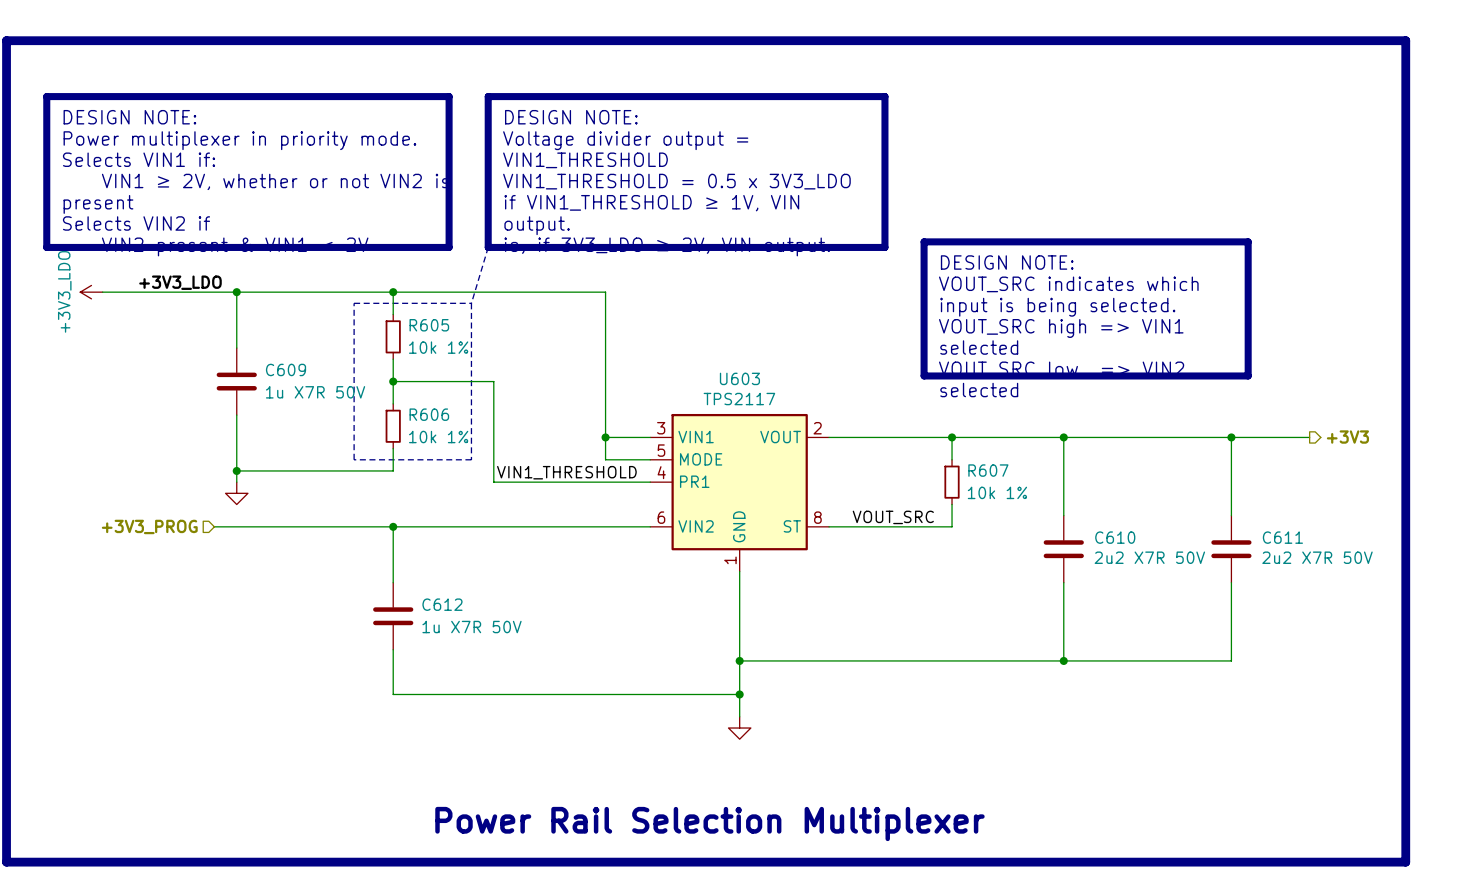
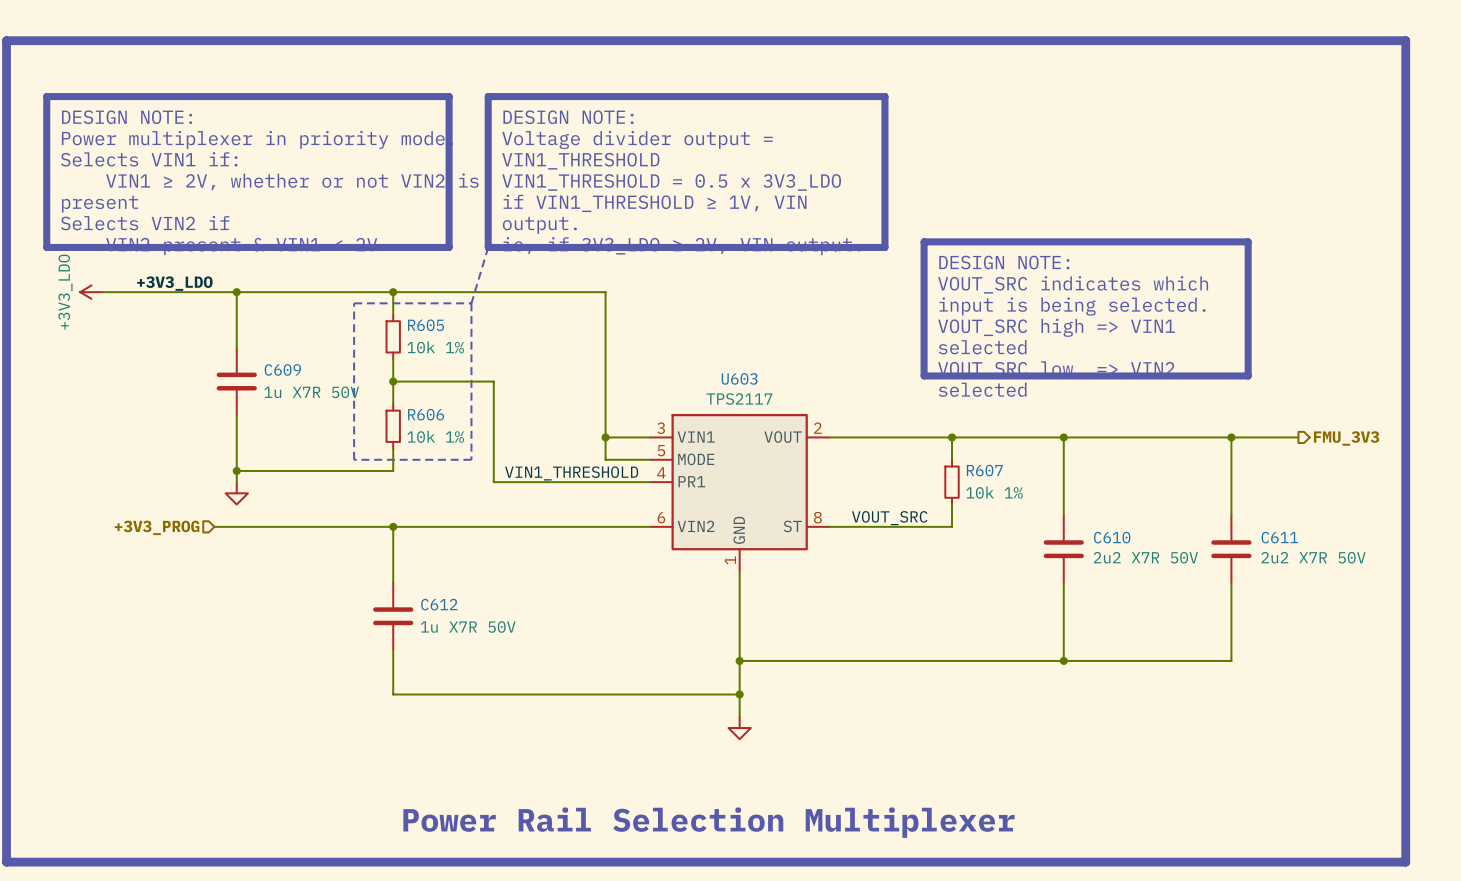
wire: (1298, 437) (1309, 437) -> none
hierarchical label: +3V3 (1347, 437) -> none
hierarchical label: none -> FMU_3V3 (1346, 438)

